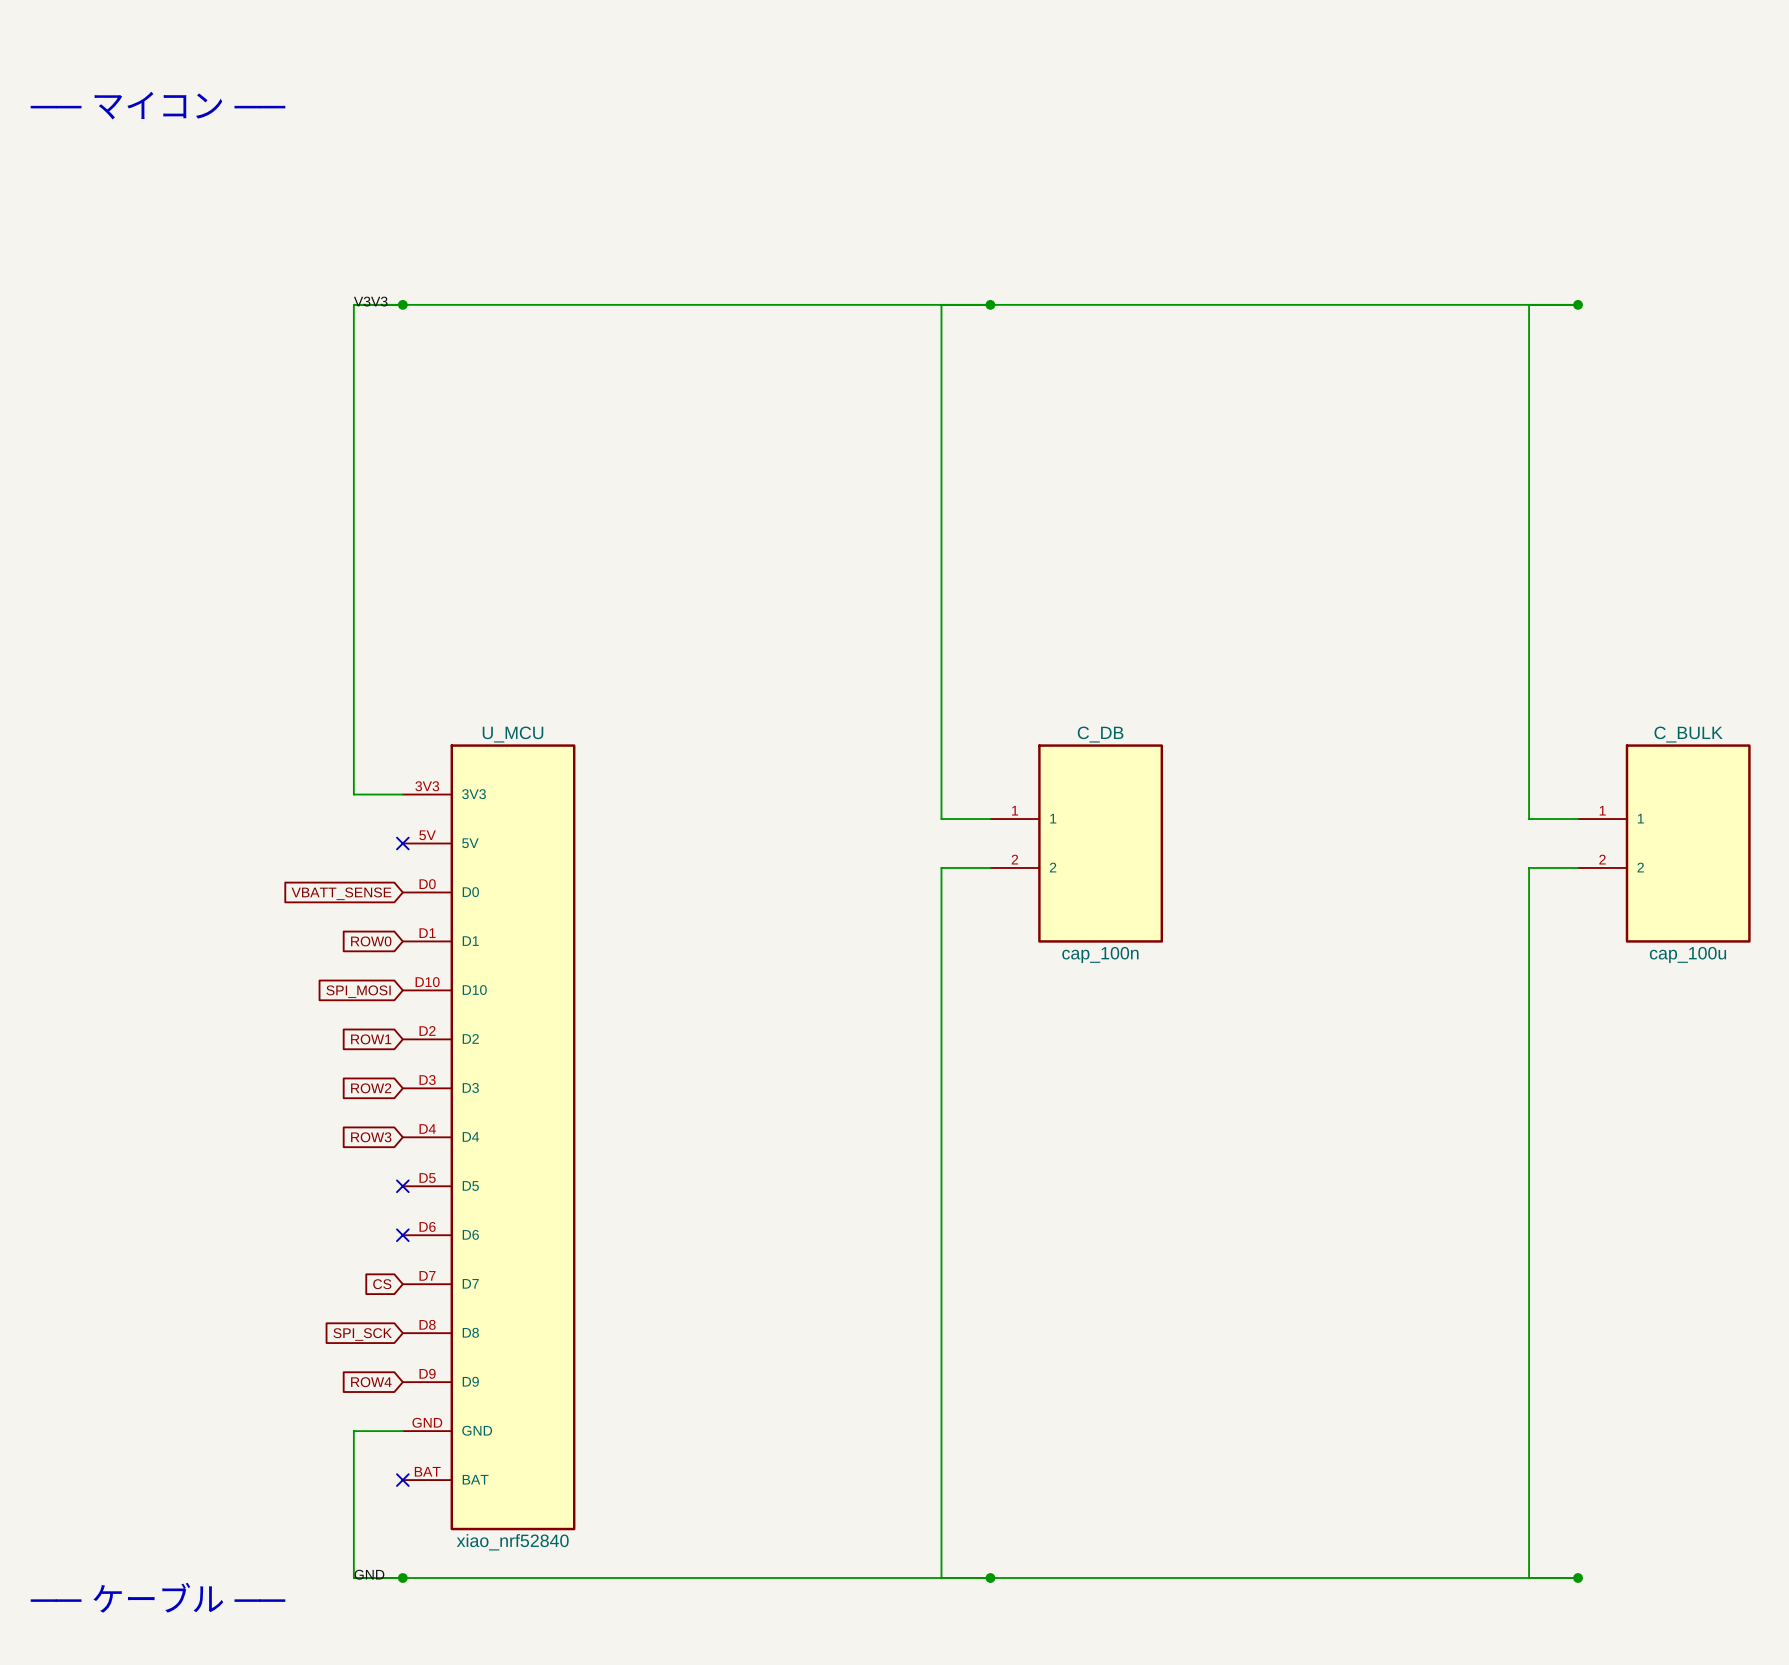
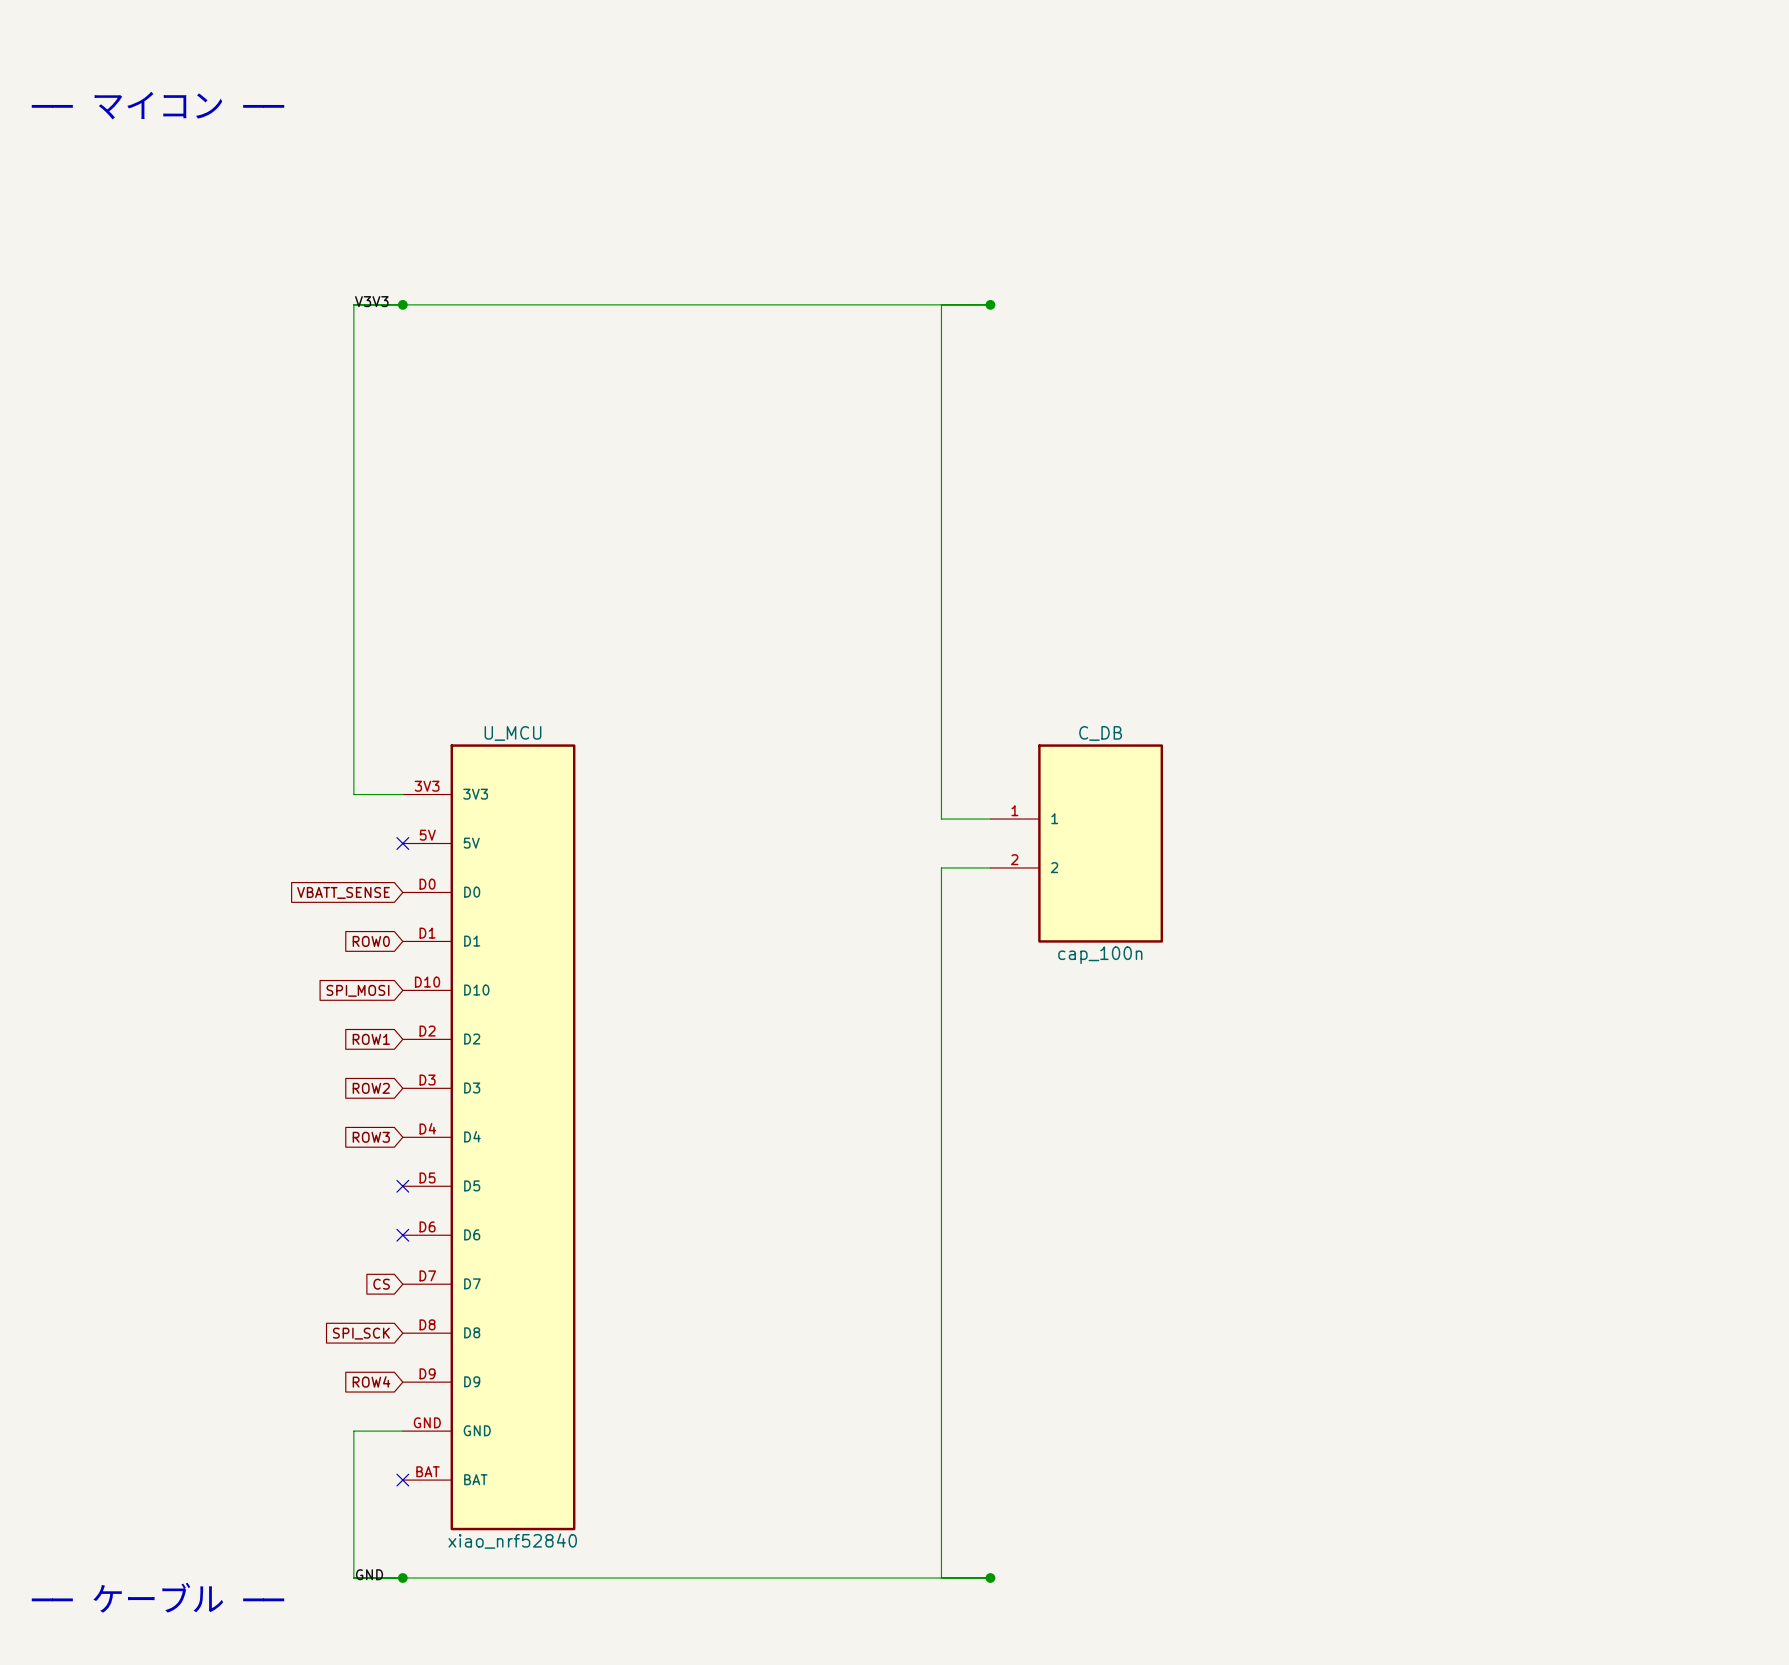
wire: (990, 304) (1578, 304) -> none
wire: (1529, 304) (1529, 819) (1578, 819) -> none
junction: (1578, 304) -> none
C_BULK: cap_100u (1664, 843) -> none
wire: (1578, 867) (1529, 867) (1529, 1578) -> none
wire: (990, 1578) (1578, 1578) -> none
junction: (1578, 1578) -> none

